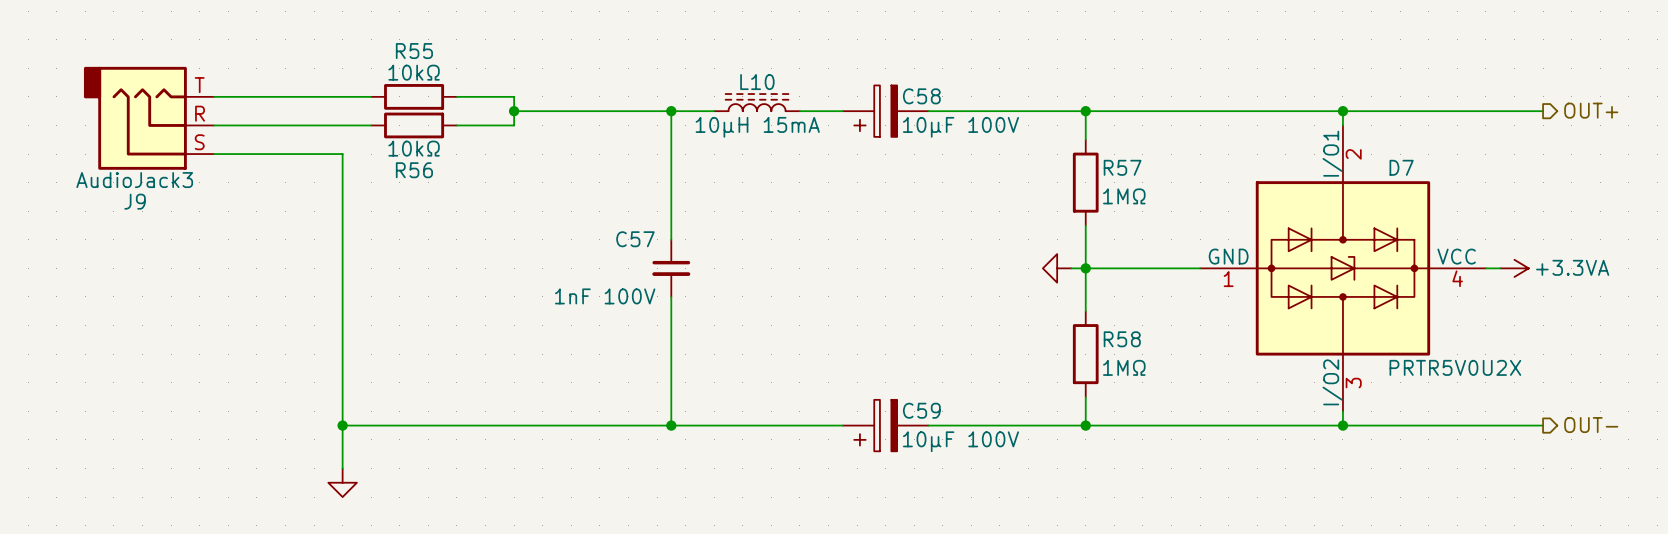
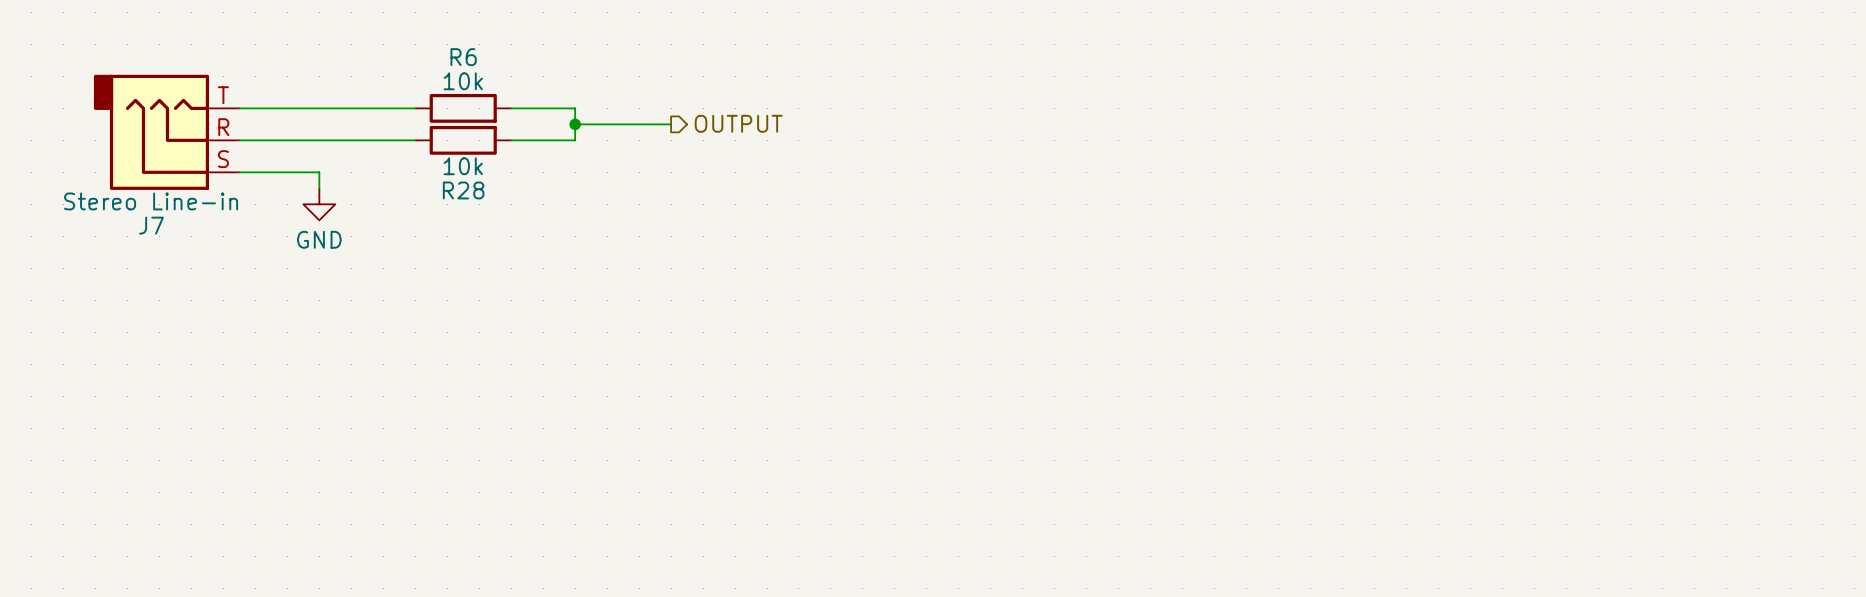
R55 name: R55 (414, 51) -> R6 (463, 57)
R55 value: 10kΩ (414, 72) -> 10k (463, 81)
L10: 10μH 15mA (757, 102) -> none
hierarchical label: none -> OUTPUT (738, 123)
hierarchical label: OUT+ (1591, 110) -> none
wire: (599, 111) (714, 111) -> none
wire: (671, 111) (671, 239) -> none
junction: (671, 111) -> none
wire: (799, 111) (842, 111) -> none
C58: 10μF 100V (885, 111) -> none
wire: (928, 111) (1543, 111) -> none
wire: (1085, 111) (1085, 139) -> none
junction: (1085, 111) -> none
wire: (1342, 111) (1342, 125) -> none
junction: (1342, 111) -> none
R56 value: 10kΩ (414, 148) -> 10k (463, 166)
wire: (285, 154) (342, 154) (342, 468) -> (319, 172) (319, 188)
R56 name: R56 (414, 170) -> R28 (463, 190)
J9 value: AudioJack3 (134, 180) -> Stereo Line-in (151, 201)
power symbol: none -> GND (319, 204)
R57: 1MΩ (1085, 182) -> none
J9 name: J9 (135, 201) -> J7 (151, 225)
wire: (1085, 225) (1085, 311) -> none
C57: 1nF 100V (671, 268) -> none
power symbol: (1057, 268) -> none
wire: (1071, 268) (1200, 268) -> none
junction: (1085, 268) -> none
D7: PRTR5V0U2X (1342, 268) -> none
wire: (1485, 268) (1500, 268) -> none
power symbol: +3.3VA (1514, 268) -> none
wire: (671, 296) (671, 425) -> none
R58: 1MΩ (1085, 354) -> none
wire: (1085, 396) (1085, 425) -> none
wire: (1342, 411) (1342, 425) -> none
wire: (342, 425) (842, 425) -> none
junction: (342, 425) -> none
junction: (671, 425) -> none
C59: 10μF 100V (885, 425) -> none
wire: (928, 425) (1543, 425) -> none
junction: (1085, 425) -> none
junction: (1342, 425) -> none
hierarchical label: OUT- (1591, 425) -> none
power symbol: (342, 482) -> none

